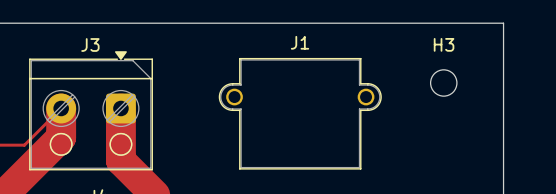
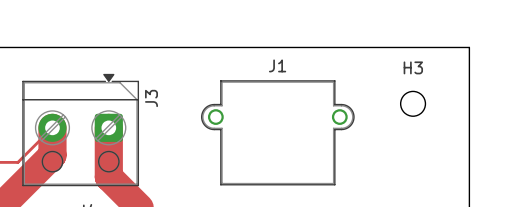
J3 name rotation: 0° (90, 45) -> 90° counterclockwise (151, 98)
J3 name position: J3 (90, 45) -> J3 (151, 98)

